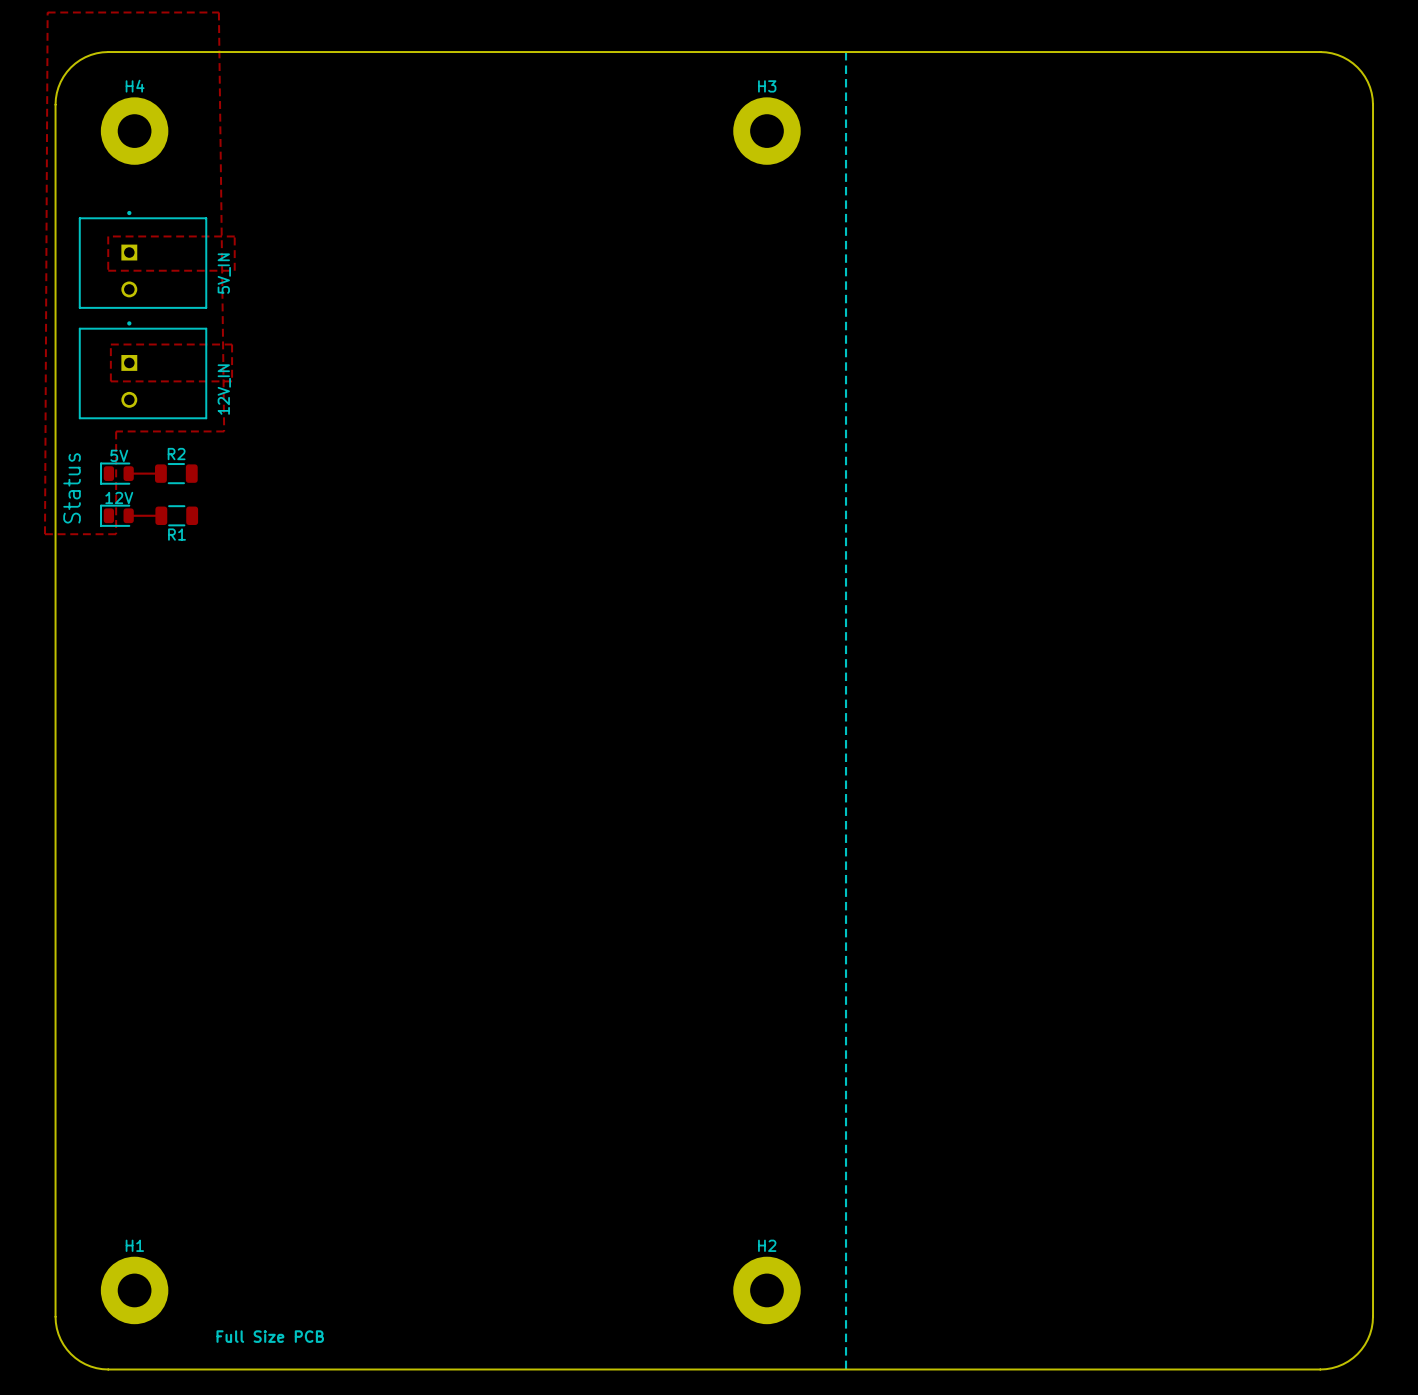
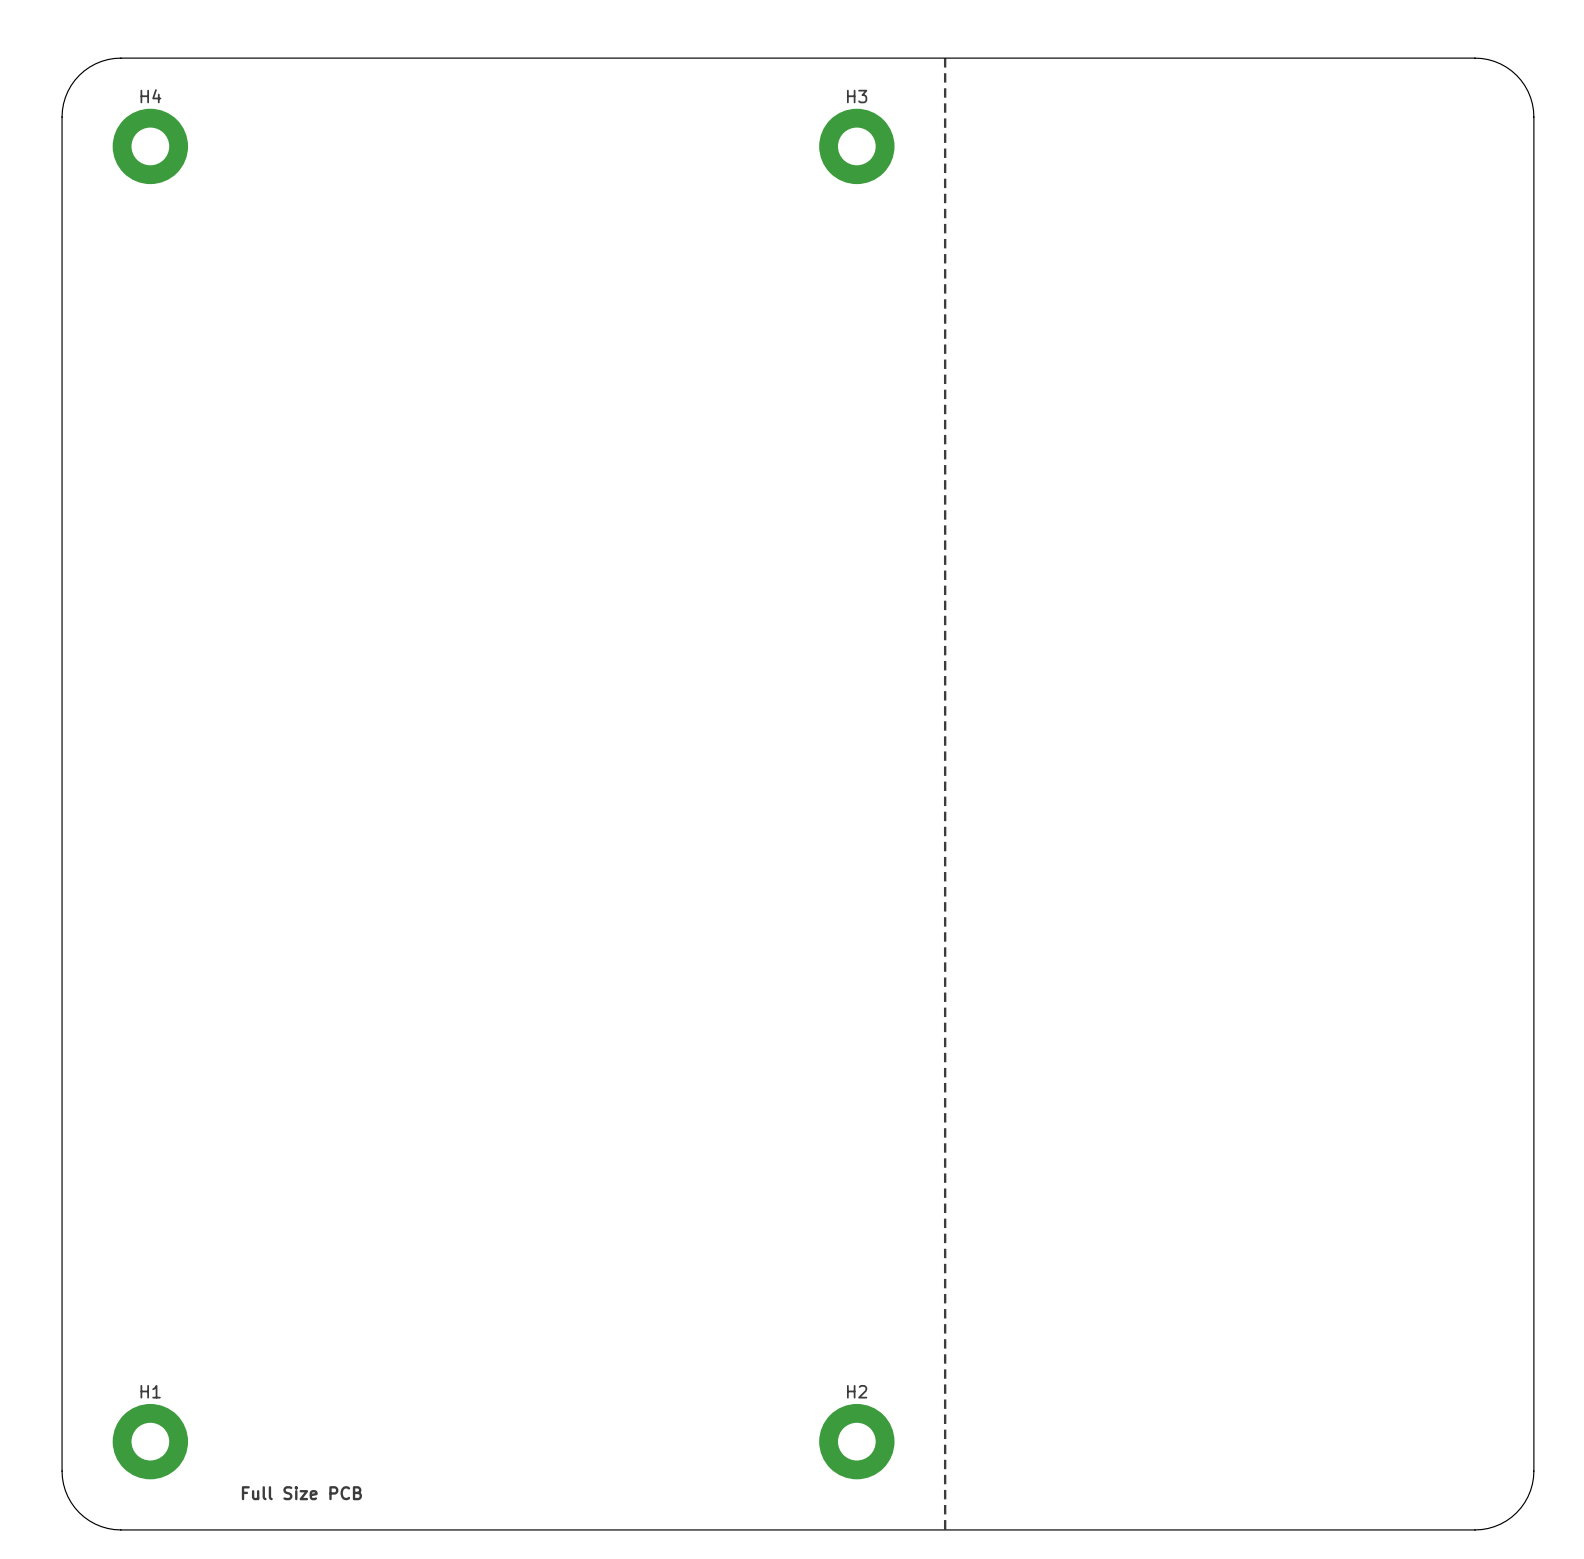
top zone outline: (47, 12) (45, 534) (116, 534) (116, 431) (224, 431) (218, 12) (47, 12) -> none
top zone outline: (108, 236) (108, 270) (234, 270) (234, 236) (108, 236) -> none
part: 5V_IN (143, 259) -> none
top zone outline: (110, 344) (232, 344) (232, 381) (110, 381) (110, 344) -> none
part: 12V_IN (143, 370) -> none
5V: (117, 473) -> none
top track: (128, 473) (160, 473) -> none
R2: (176, 473) -> none
text: Status (72, 488) -> none
12V: (117, 515) -> none
top track: (128, 515) (161, 515) -> none
R1: (176, 515) -> none

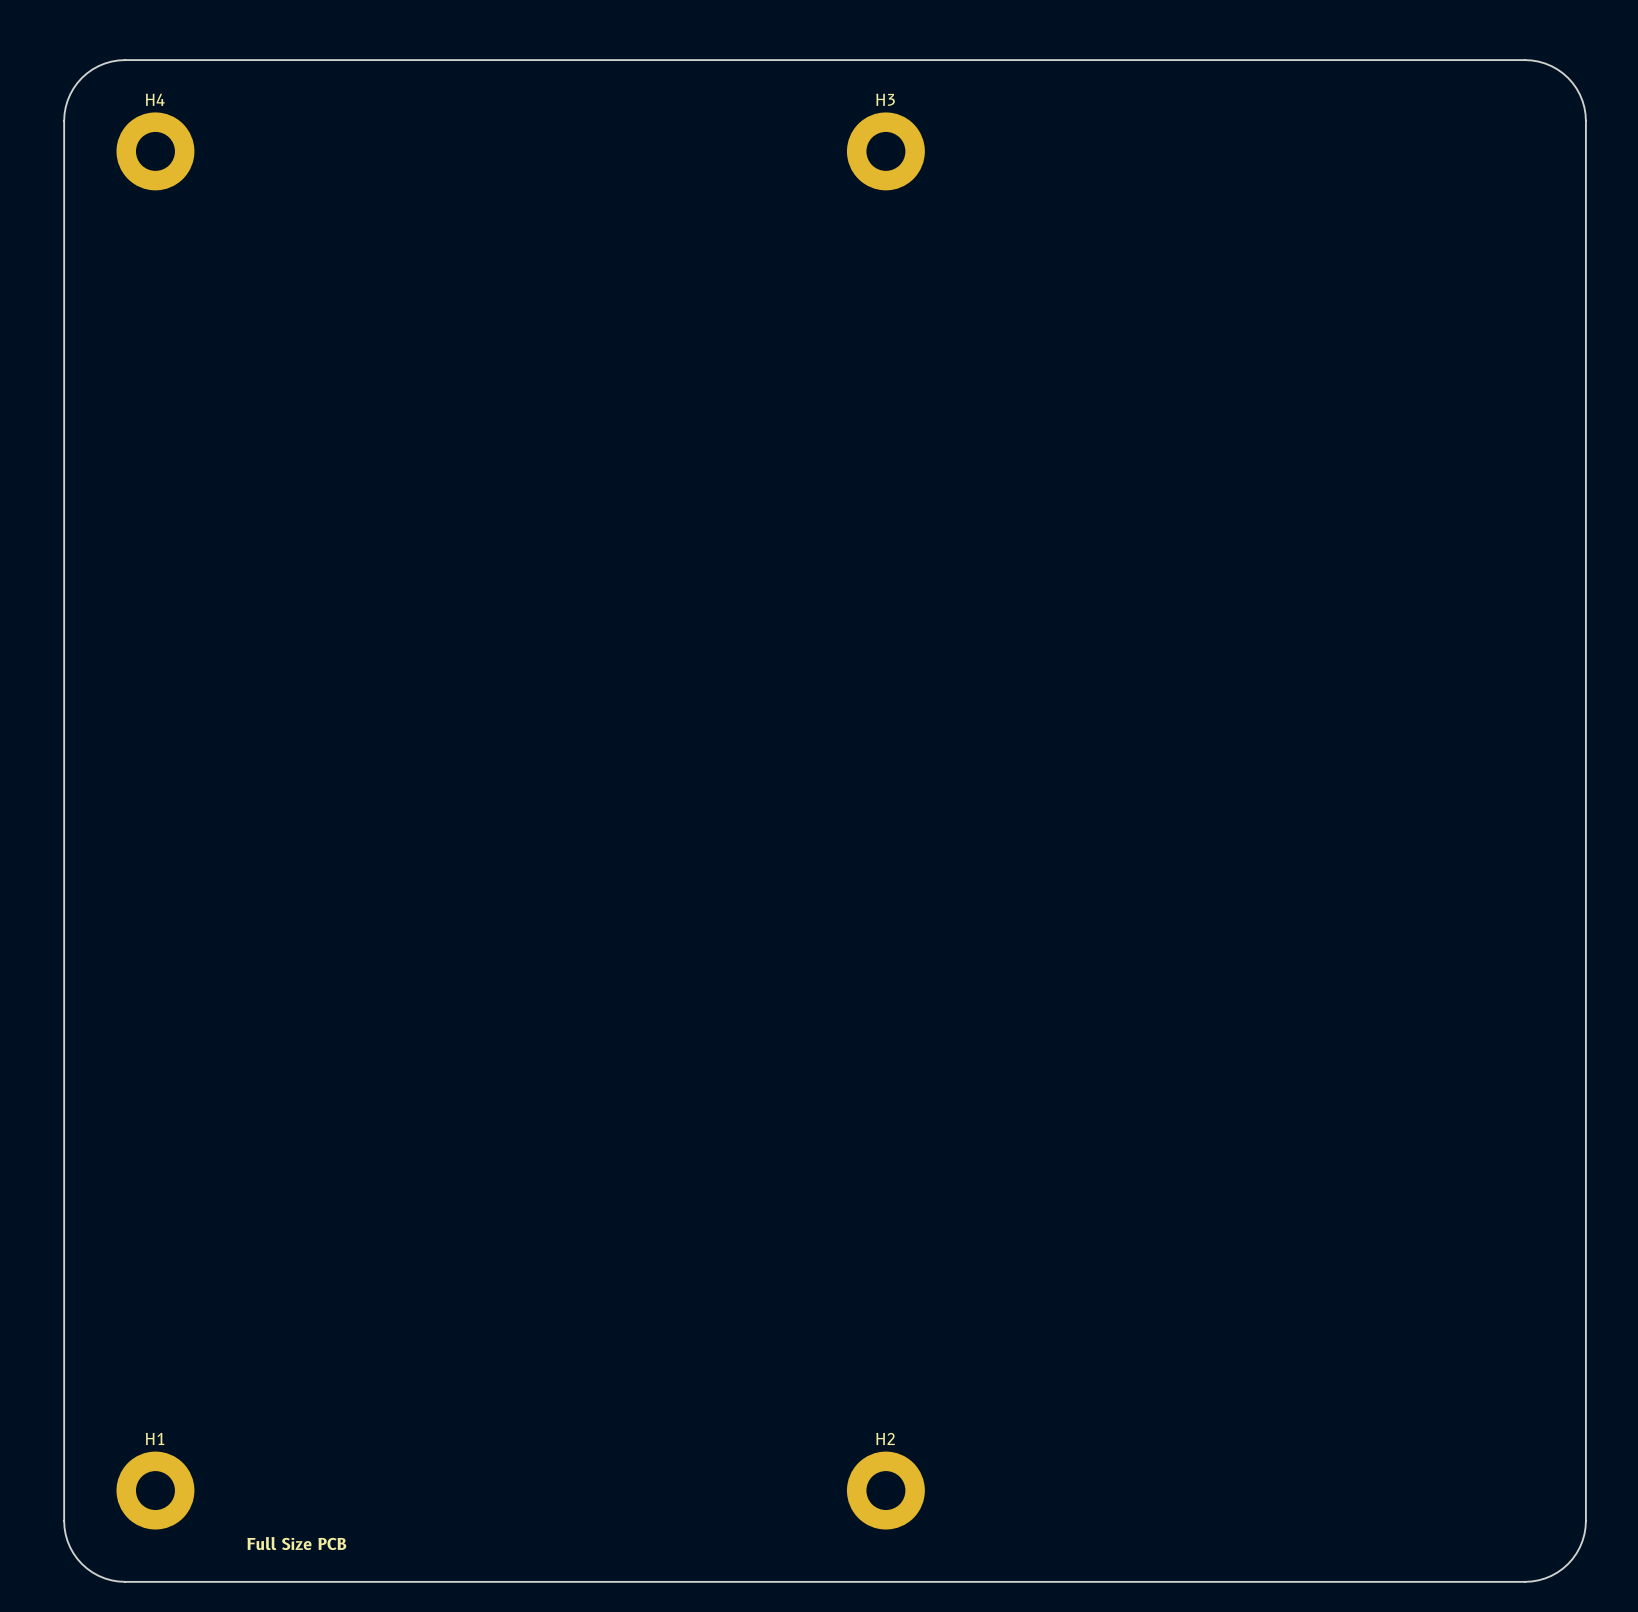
line: (945, 58) (945, 1529) -> none

